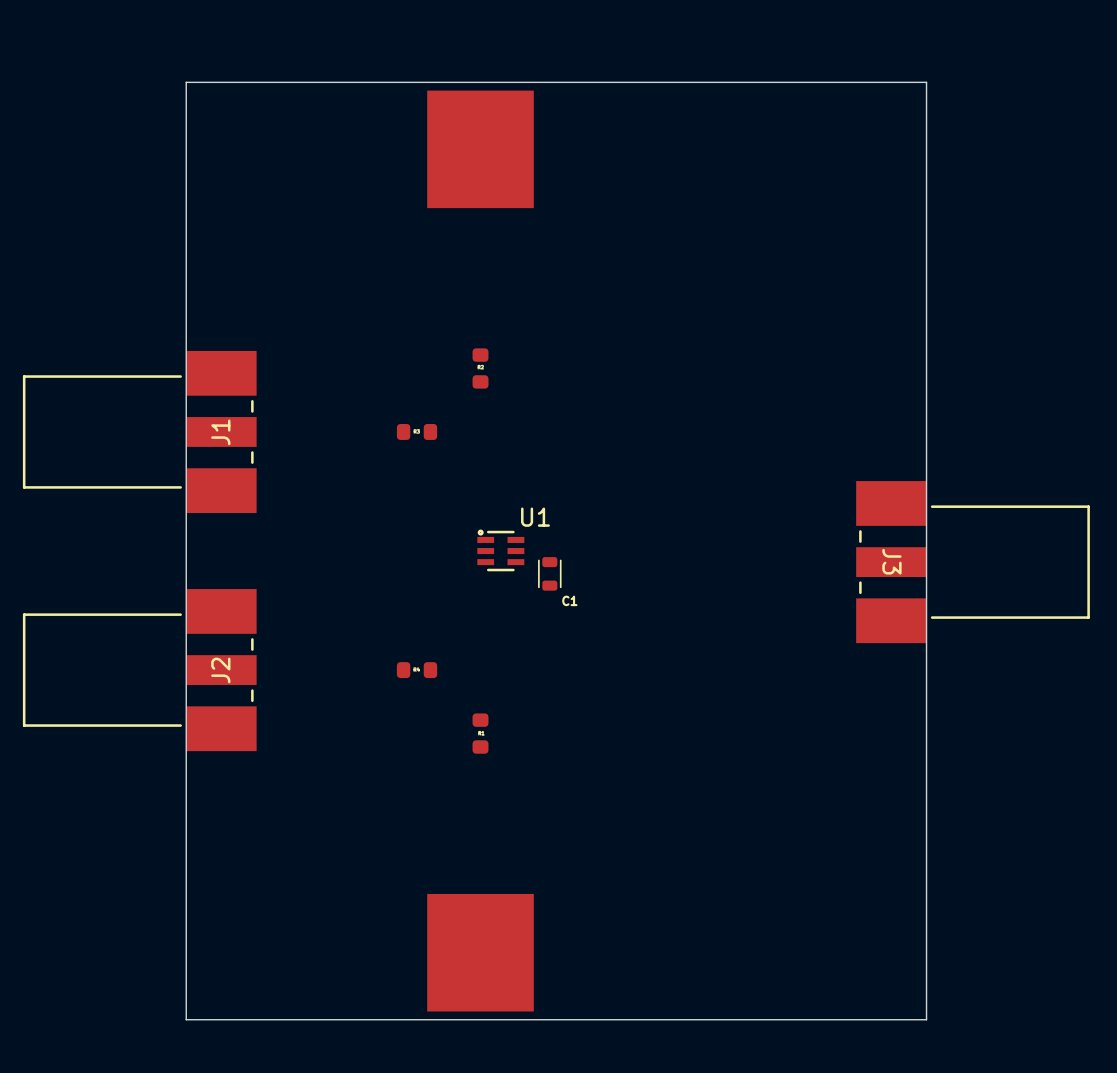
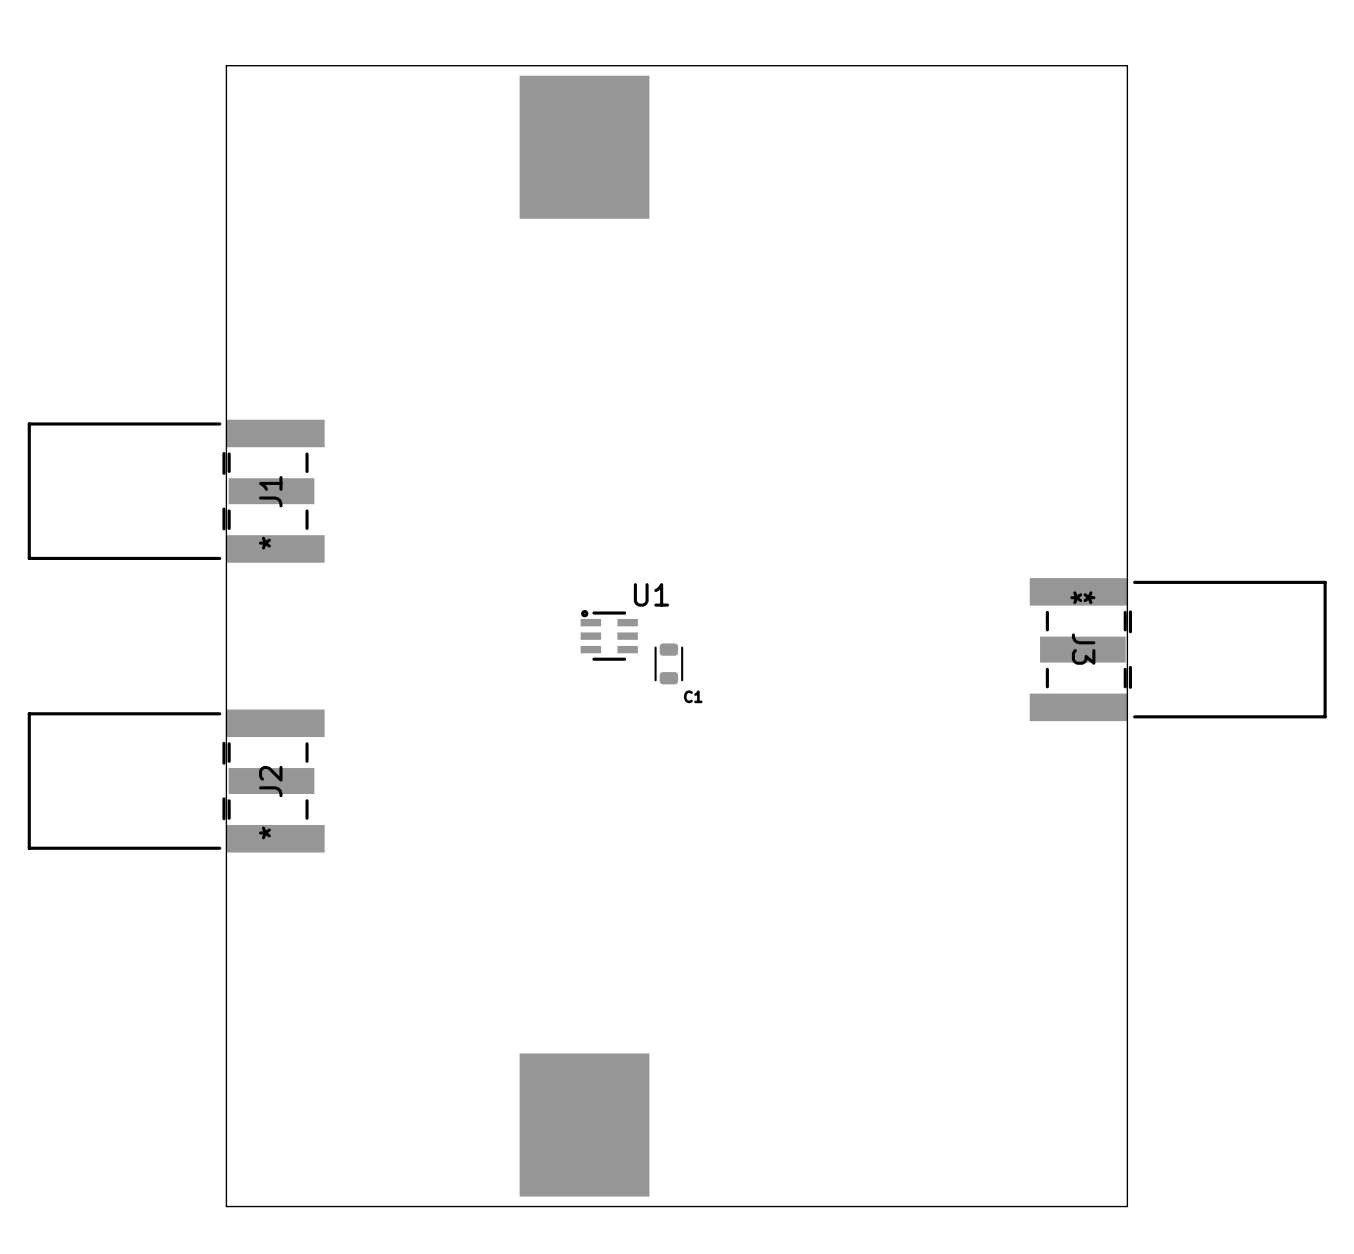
J1 footprint: [22, 350, 257, 514] -> [27, 419, 325, 563]
part: (480, 368) -> none
part: (417, 431) -> none
J3 footprint: [856, 481, 1090, 644] -> [1029, 578, 1327, 722]
J2 footprint: [22, 589, 257, 752] -> [27, 709, 325, 853]
part: (417, 670) -> none
part: (480, 733) -> none

